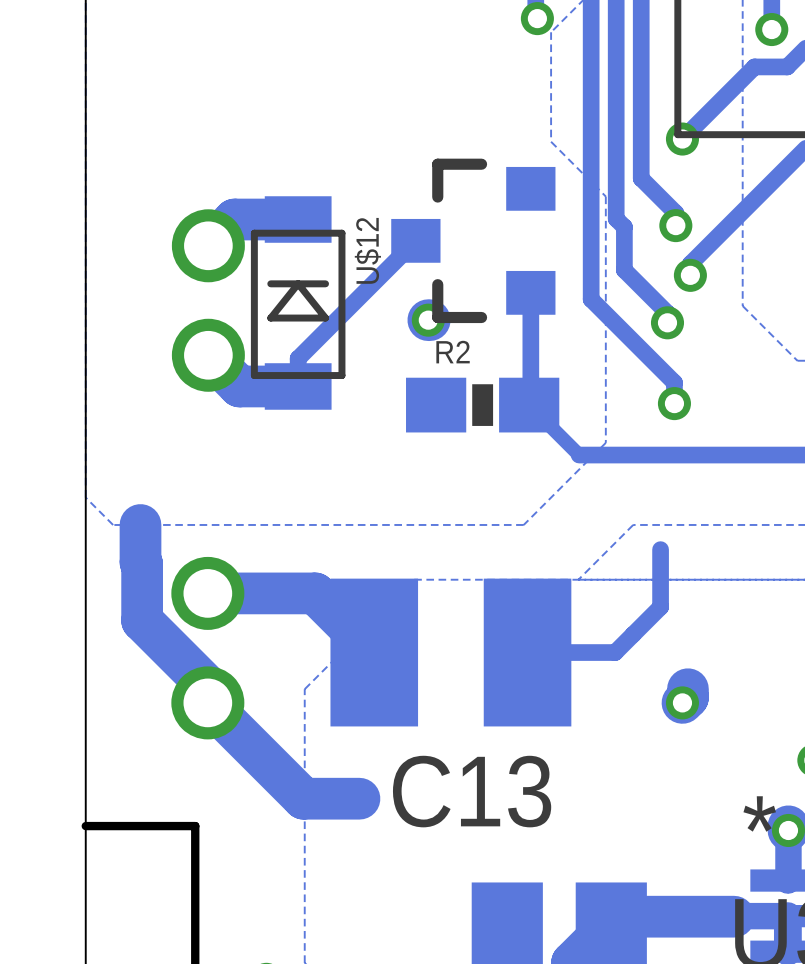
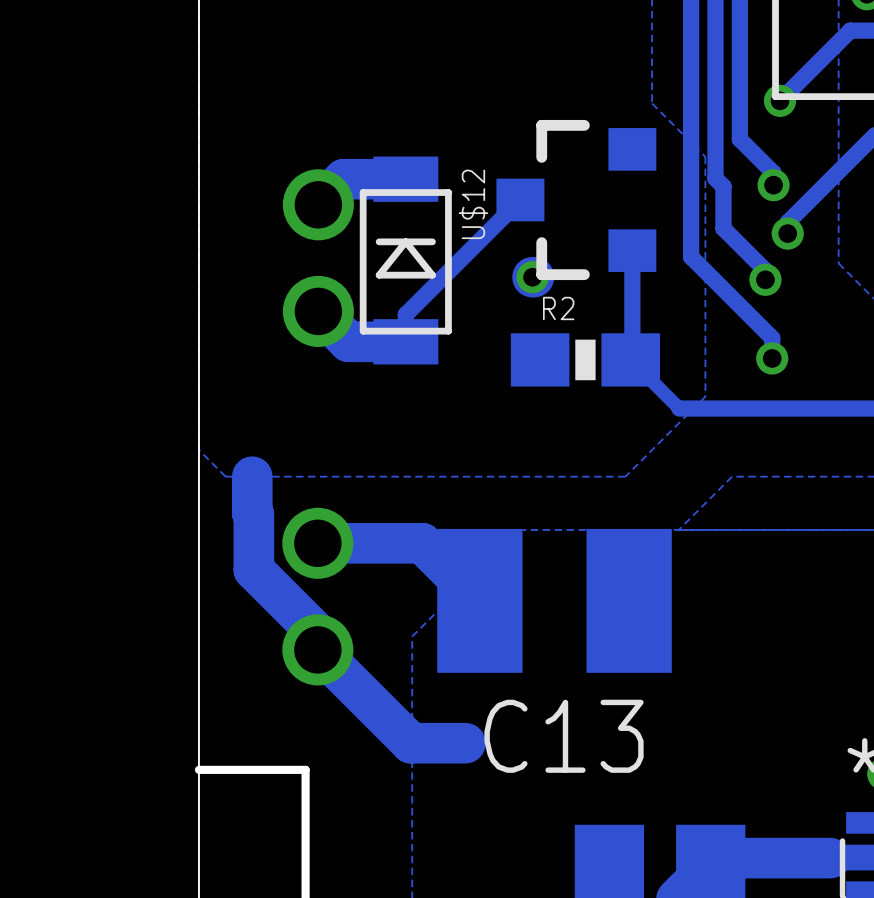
track: (660, 549) (660, 607) (615, 652) (527, 652) -> none
track: (687, 689) (687, 697) (682, 702) -> none
via: (682, 702) -> none

